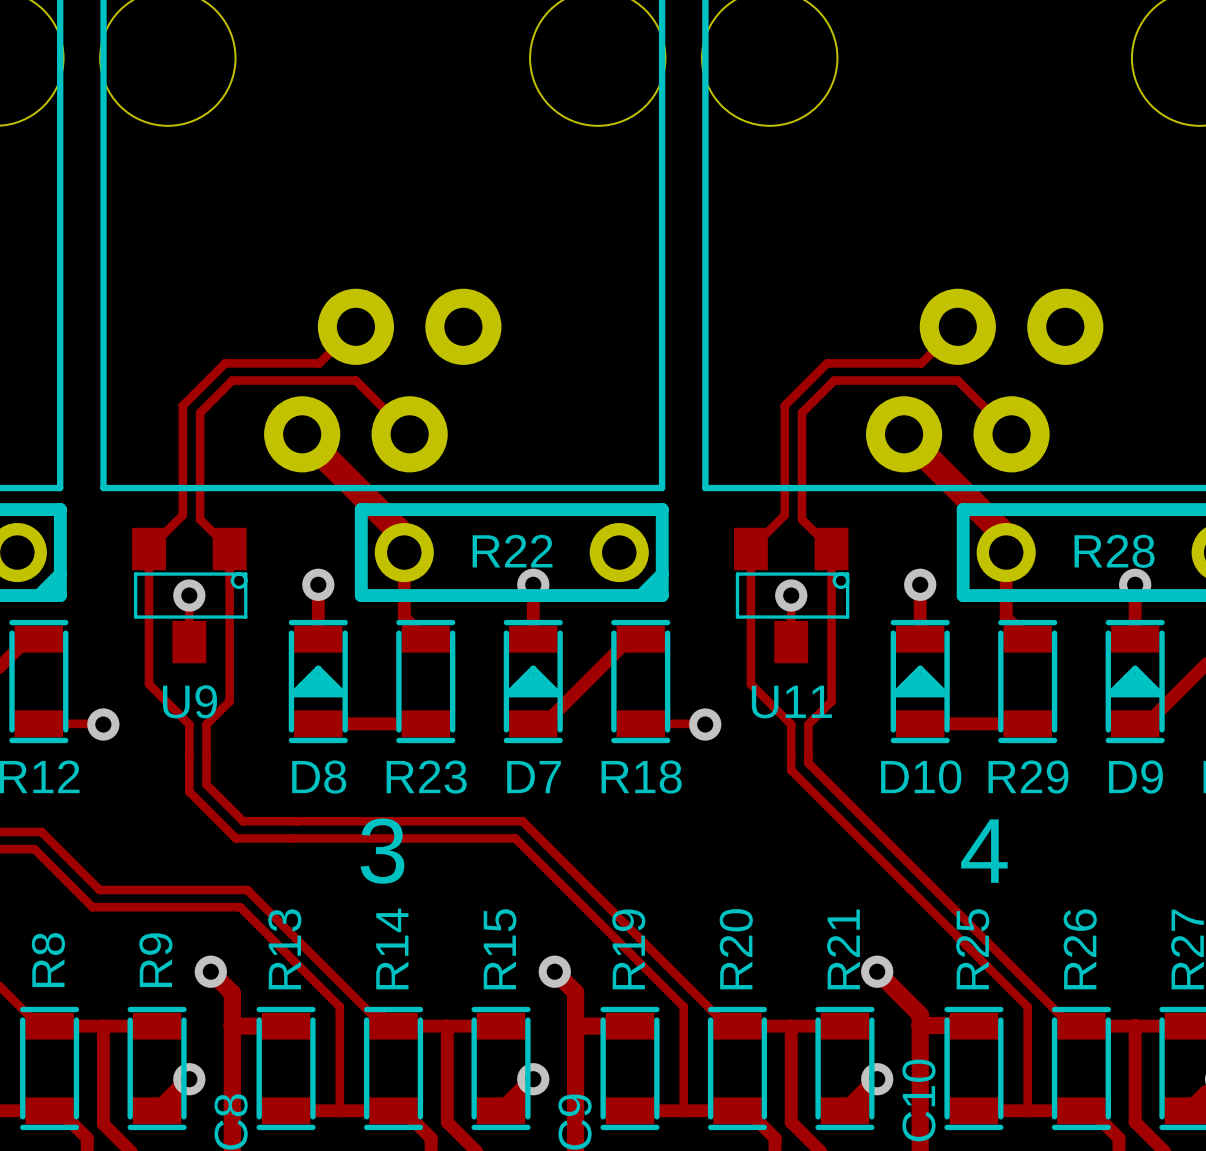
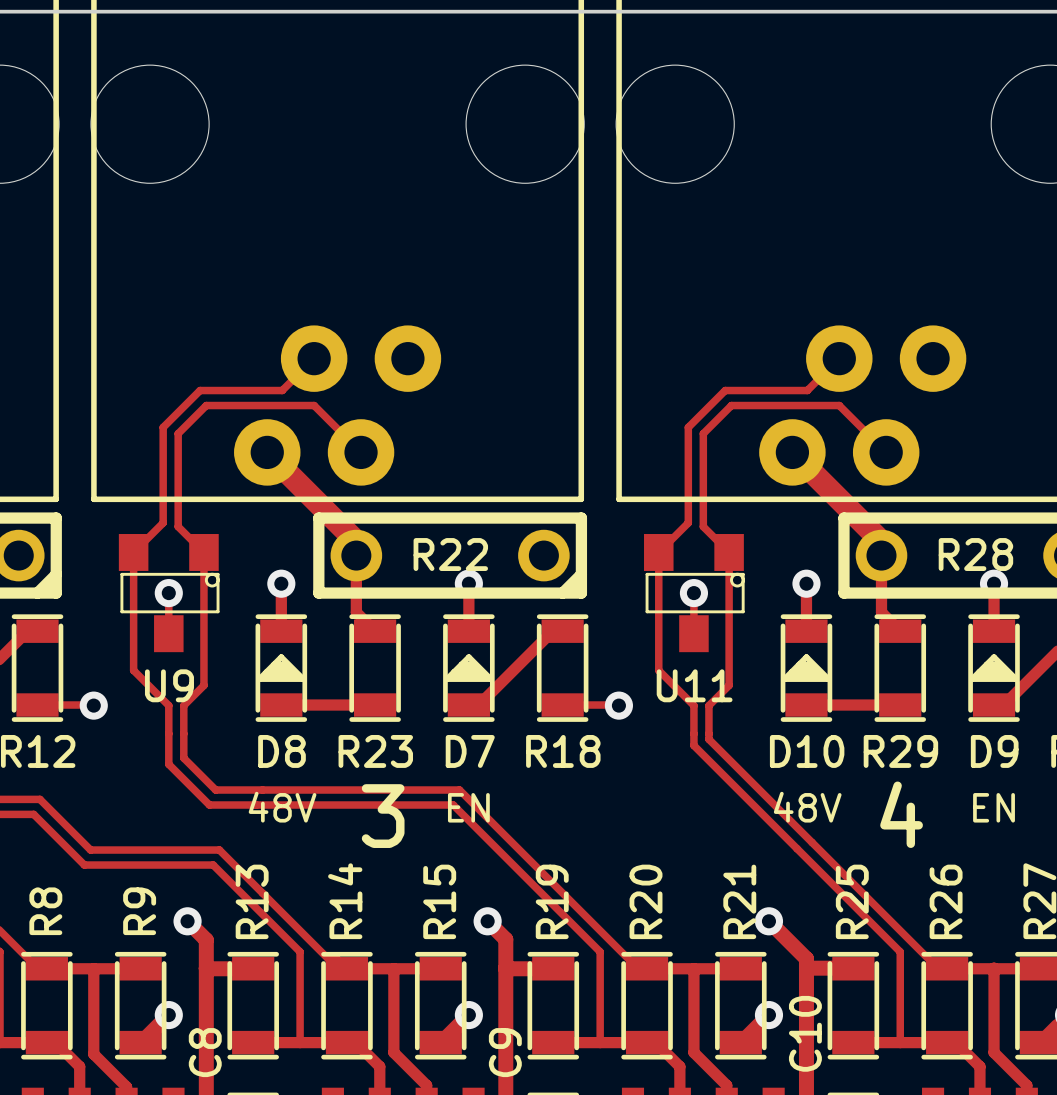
text: none -> 48V (282, 807)
text: none -> EN (468, 807)
text: none -> 48V (807, 807)
text: none -> EN (994, 807)
text position: 3 (382, 851) -> 3 (383, 816)
text position: 4 (984, 851) -> 4 (901, 814)

